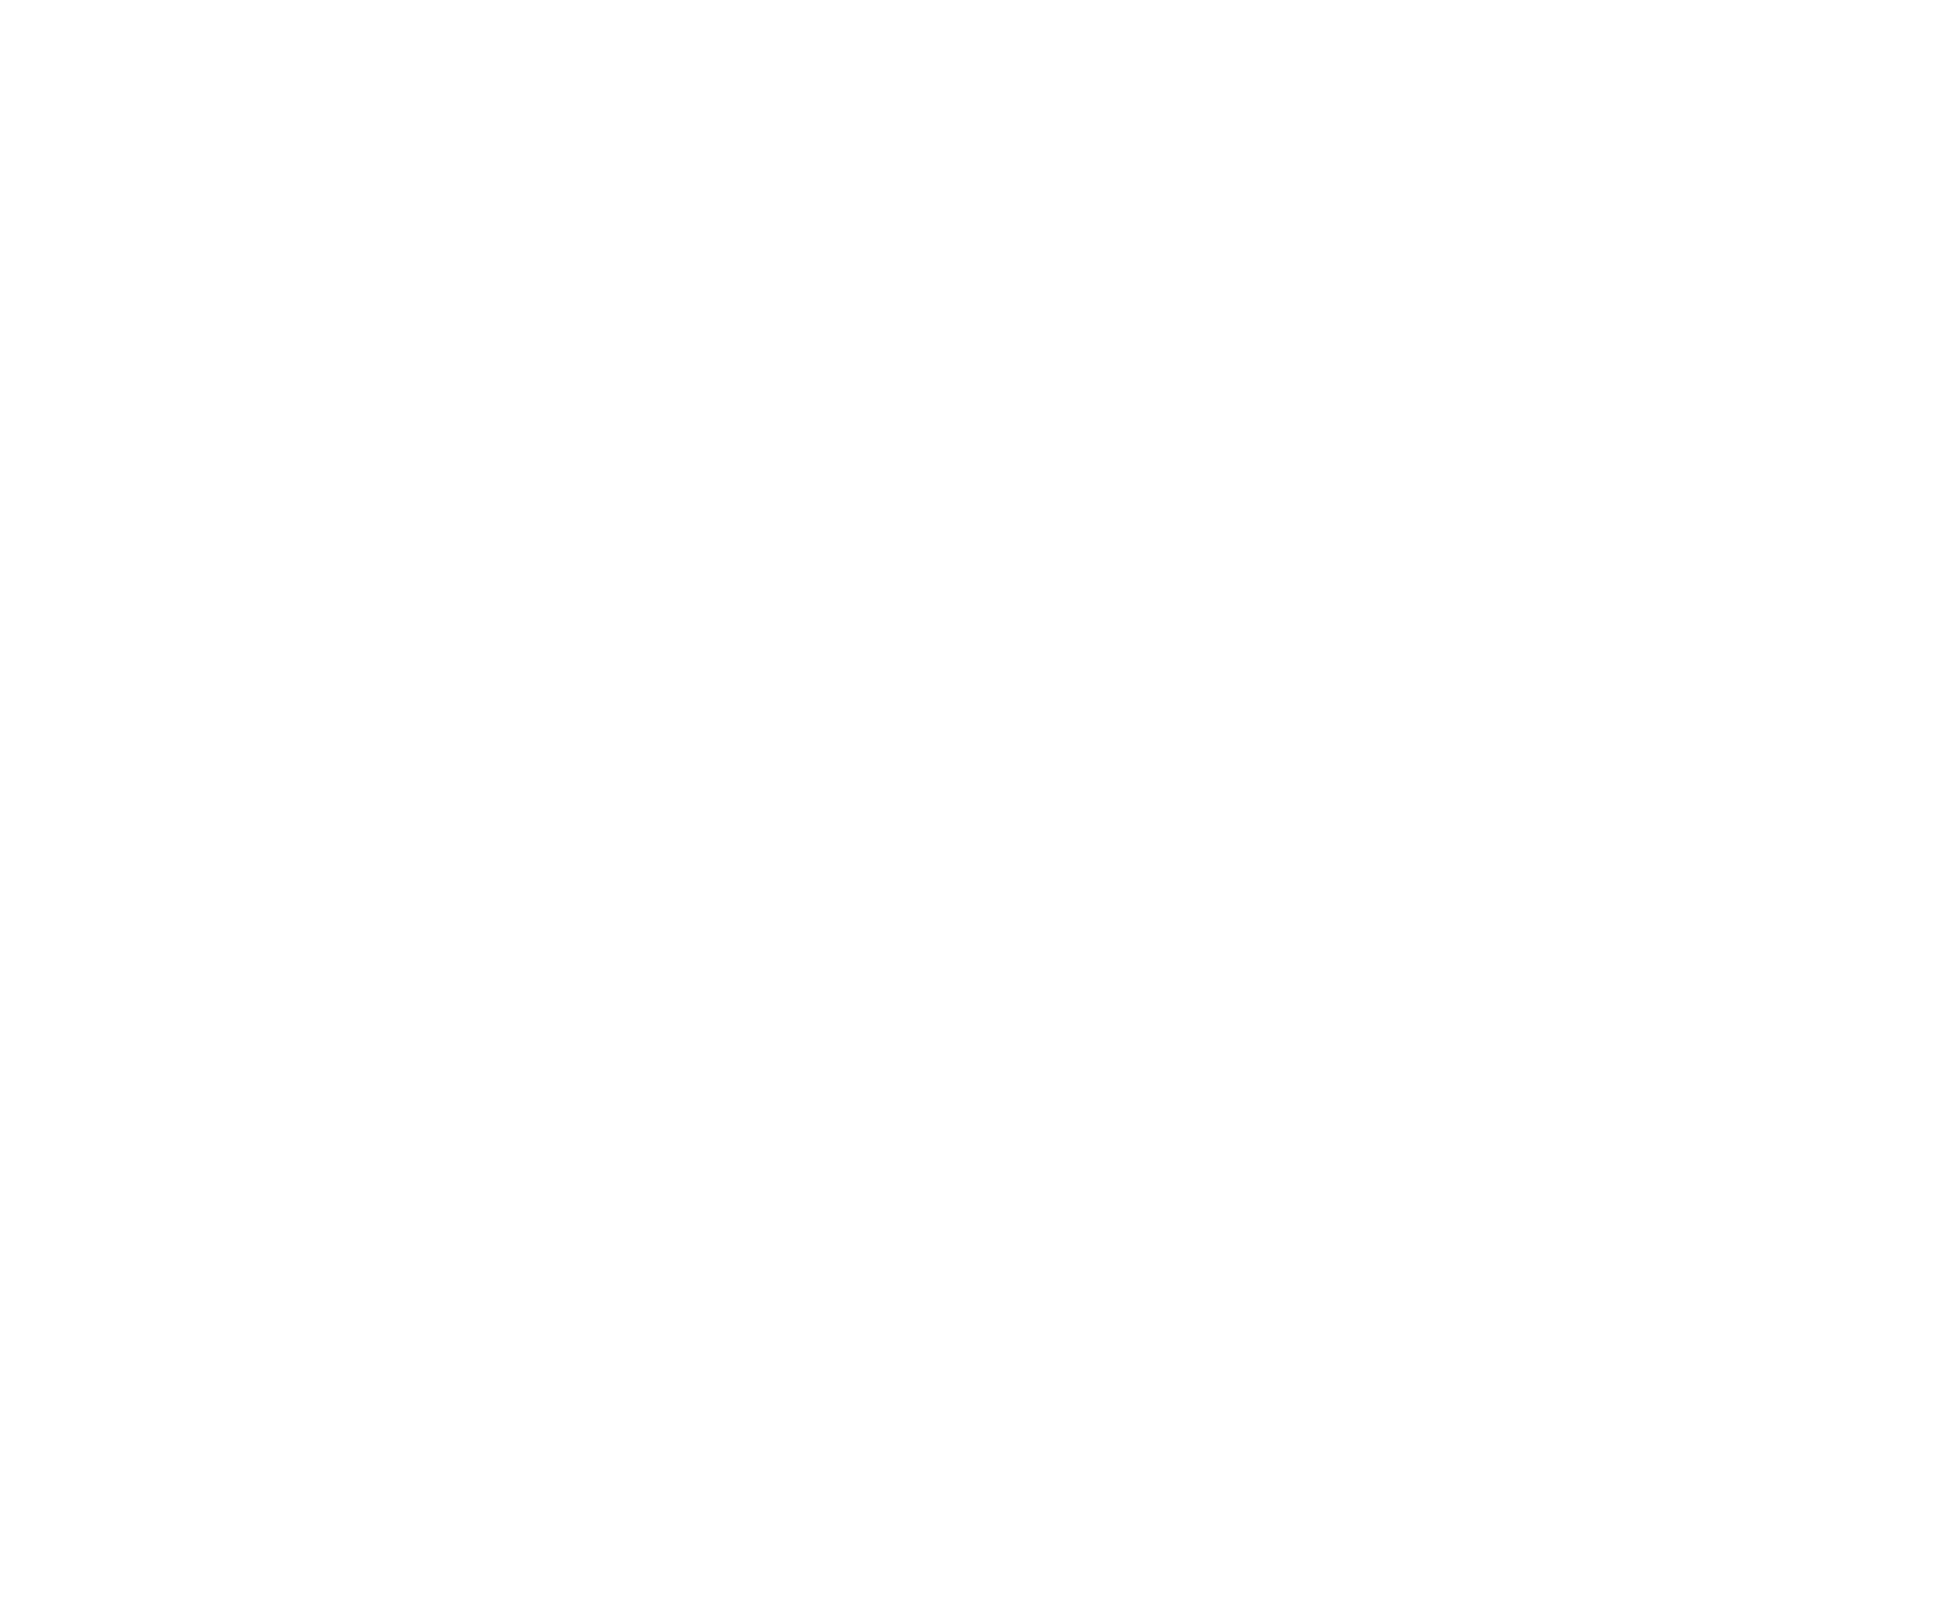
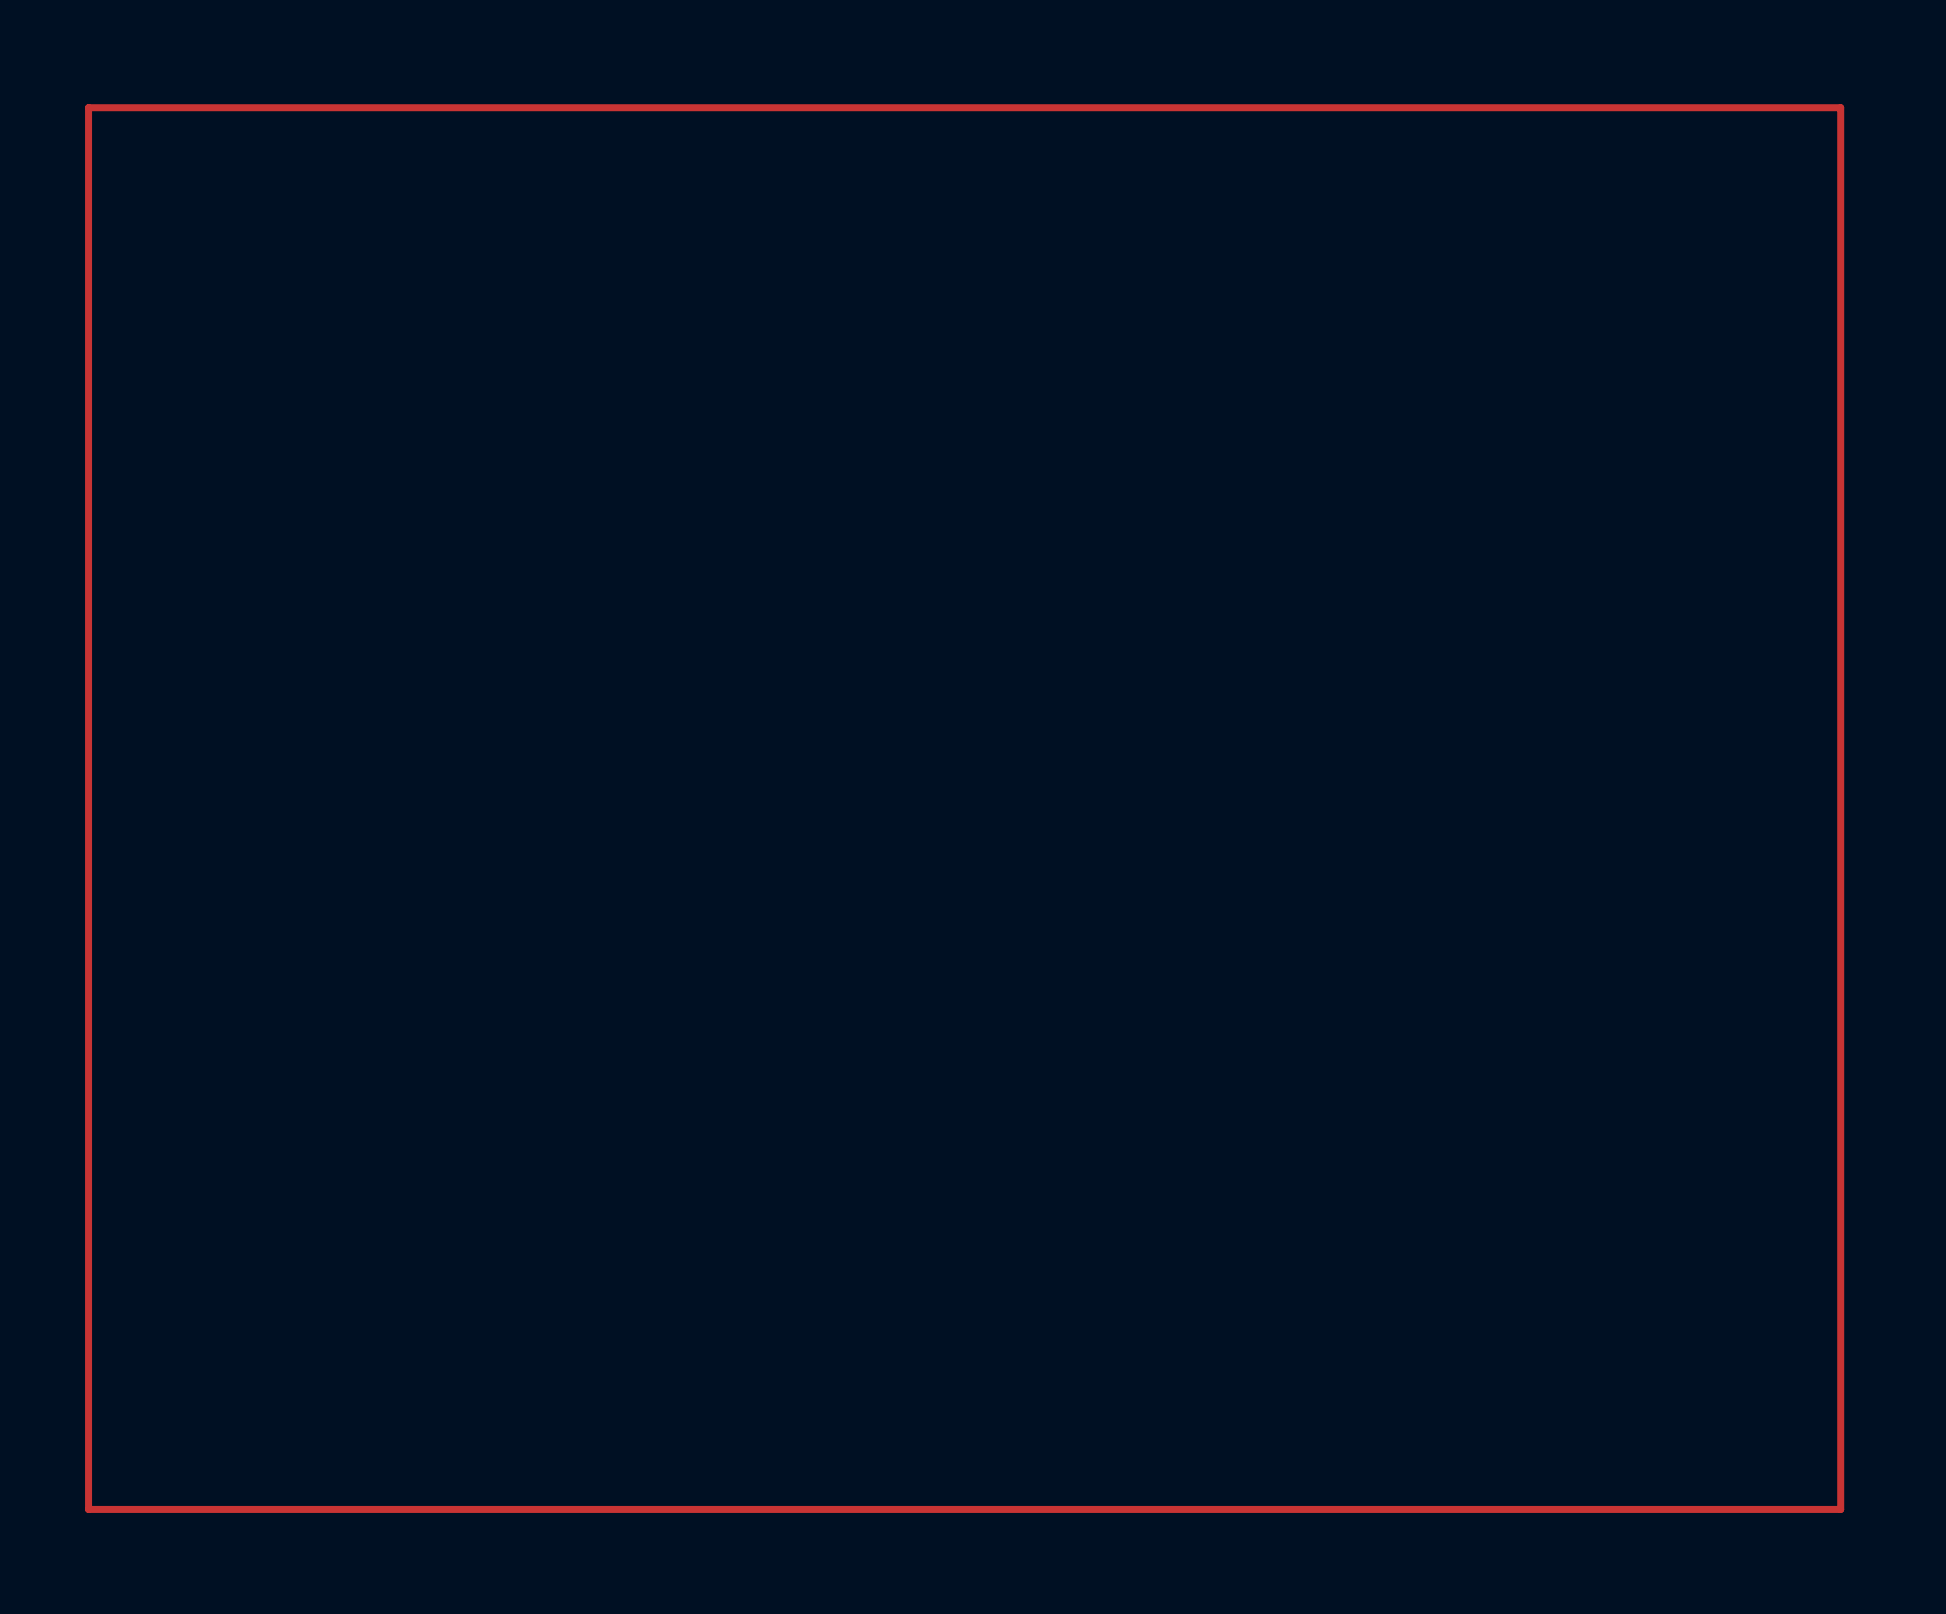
top track: none -> (88, 107) (1840, 107) (1840, 1509) (88, 1509) (88, 107)

